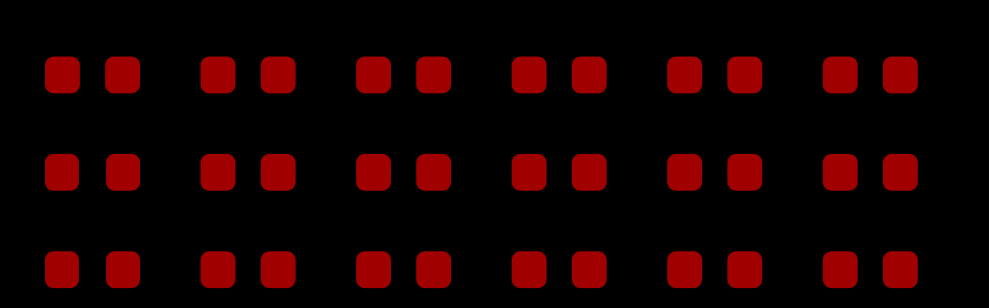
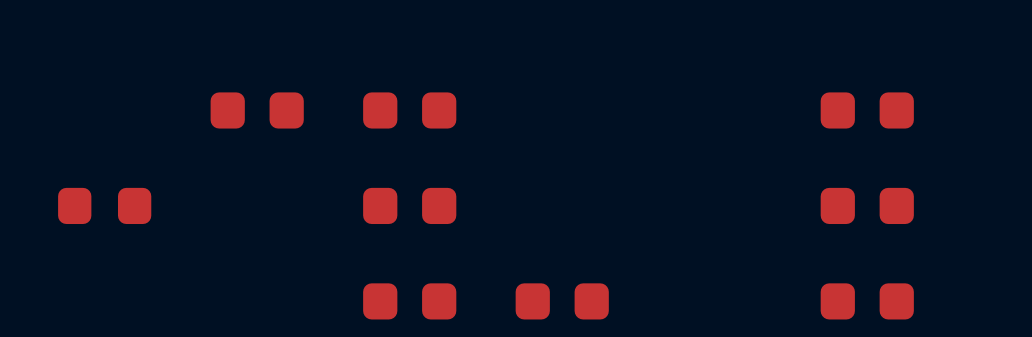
part: (92, 74) -> none
part: (559, 74) -> none
part: (714, 74) -> none
part: (248, 172) -> none
part: (559, 172) -> none
part: (714, 172) -> none
part: (92, 269) -> none
part: (248, 269) -> none
part: (714, 269) -> none

